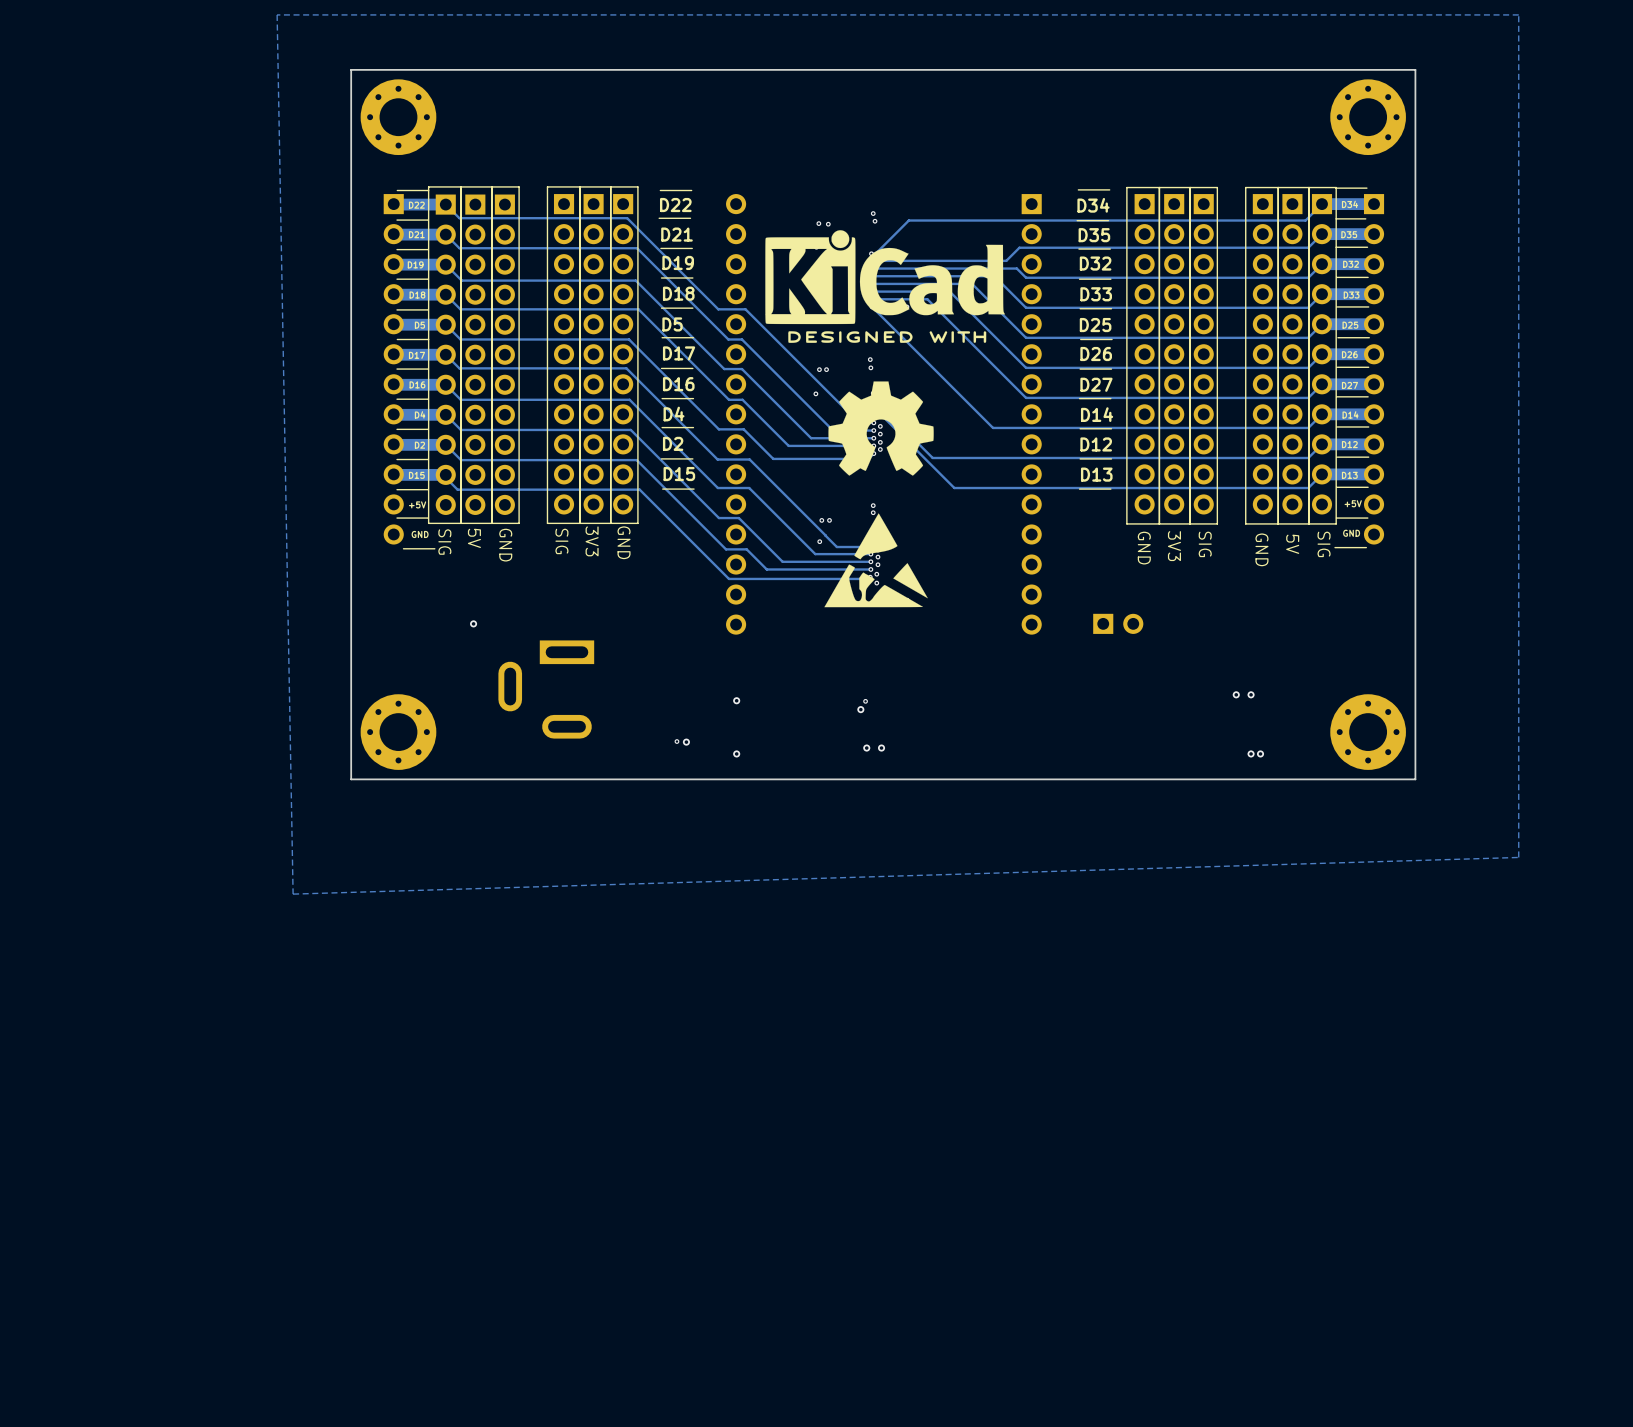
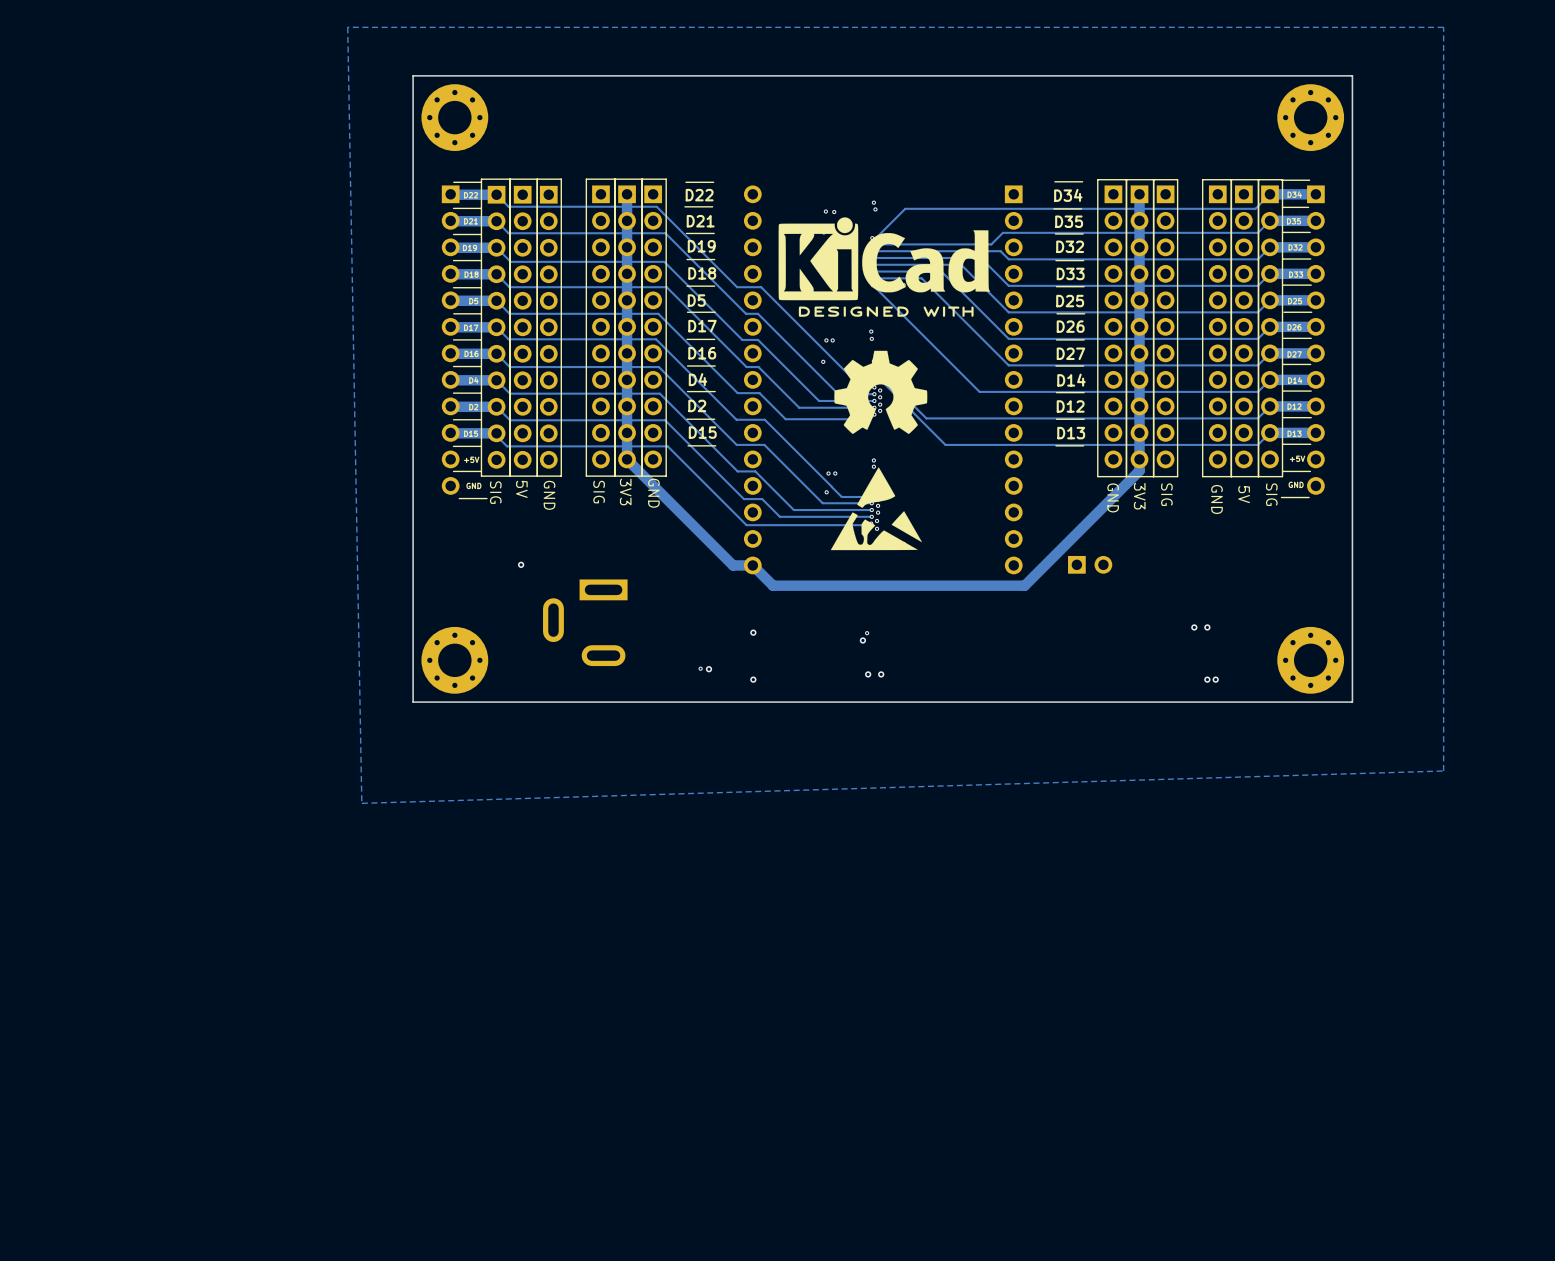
track: none -> (1139, 194) (1139, 470) (1024, 585) (773, 585) (752, 565) (733, 565) (627, 459) (627, 194)

